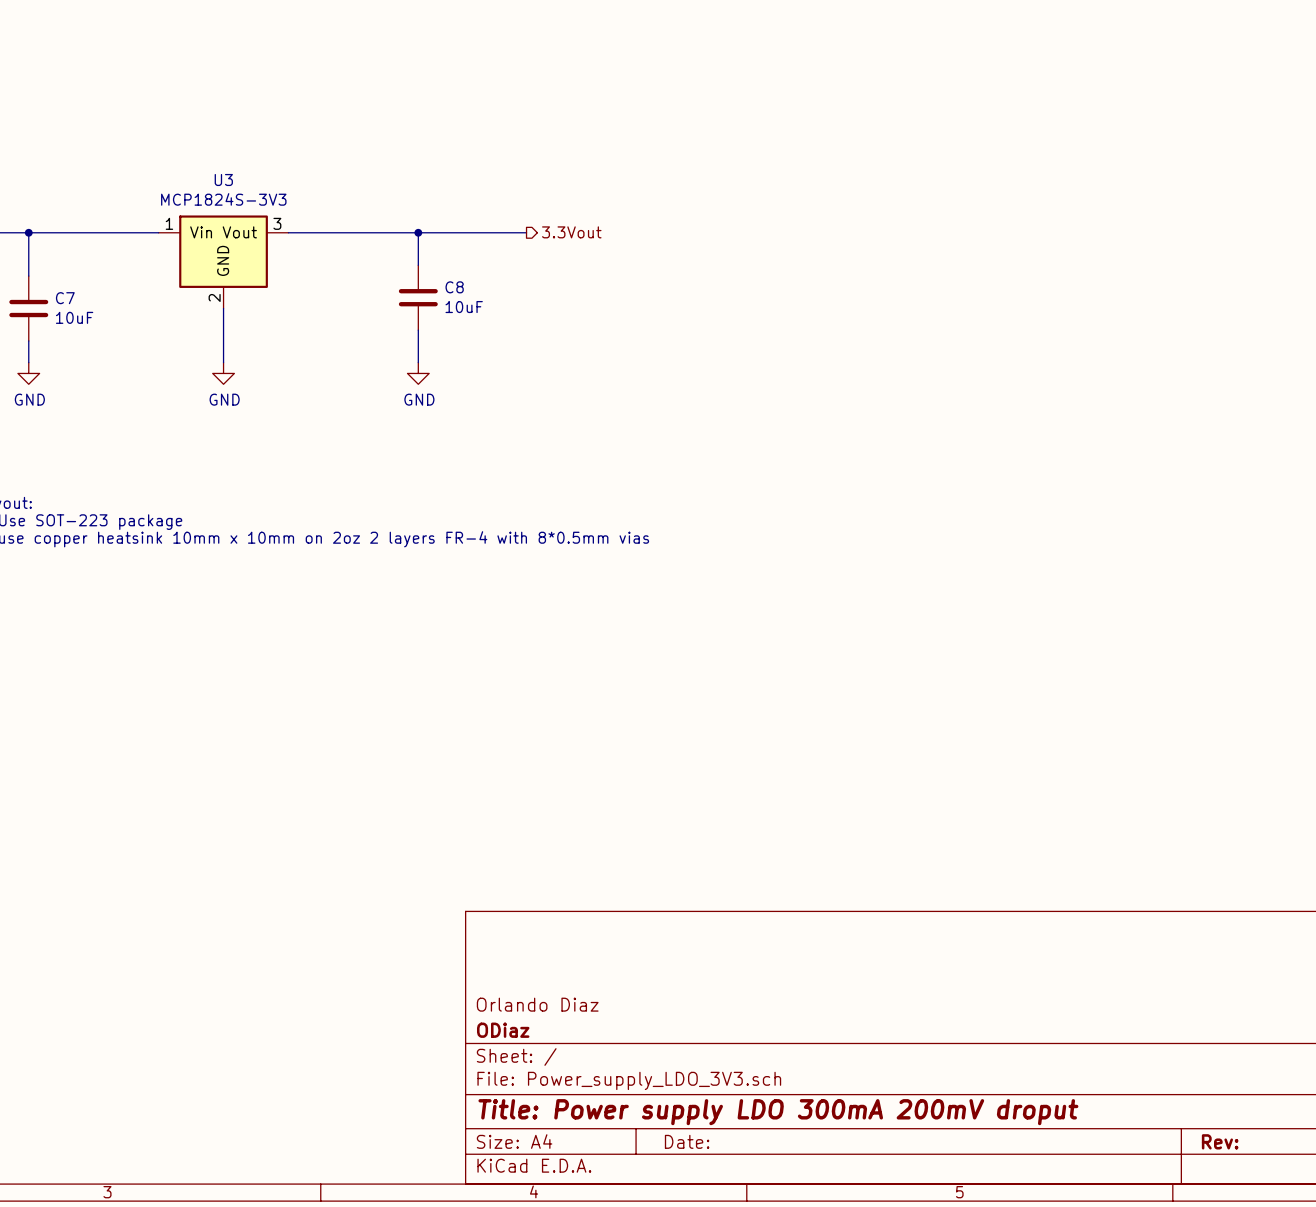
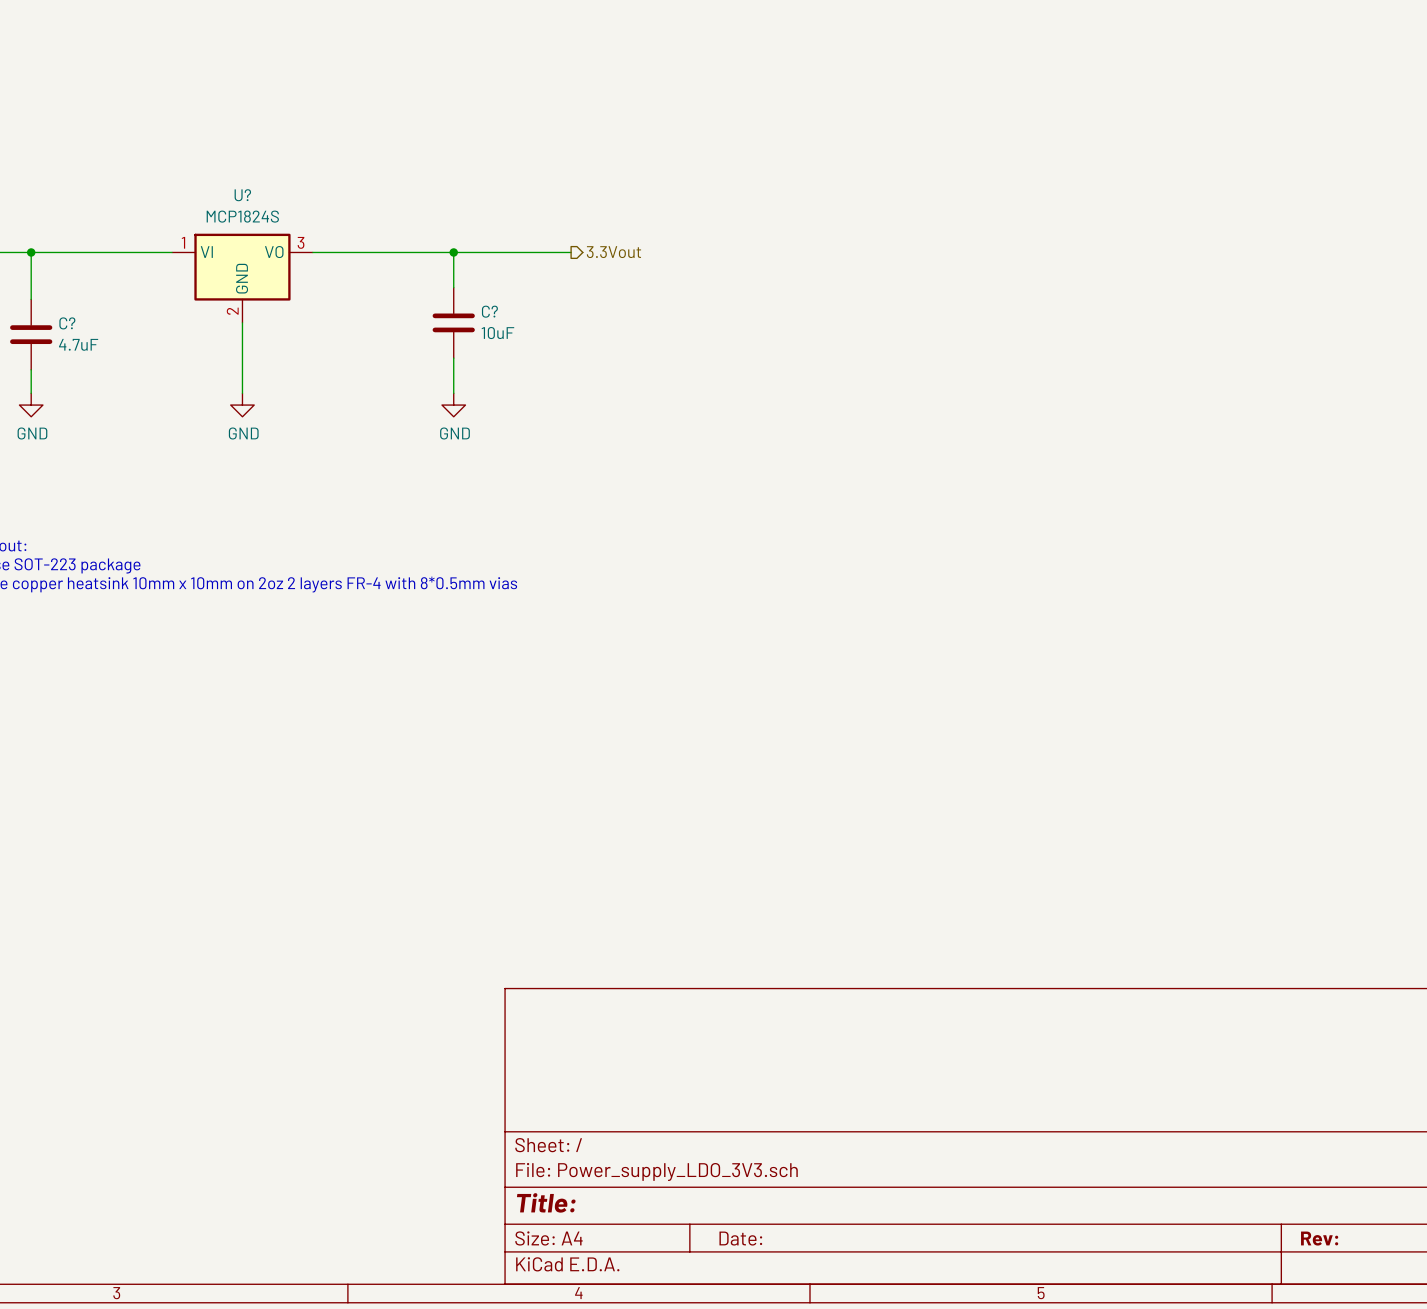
U?: none -> MCP1824S (242, 278)
U3: MCP1824S-3V3 (223, 261) -> none
C8 name: C8 (454, 287) -> C? (489, 311)
C7 name: C7 (65, 298) -> C? (67, 323)
C7 value: 10uF (74, 317) -> 4.7uF (78, 344)
title block: Orlando Diaz (537, 1004) -> none
title block: ODiaz (503, 1030) -> none
title block: Title: Power supply LDO 300mA 200mV droput (778, 1112) -> Title: (546, 1202)

